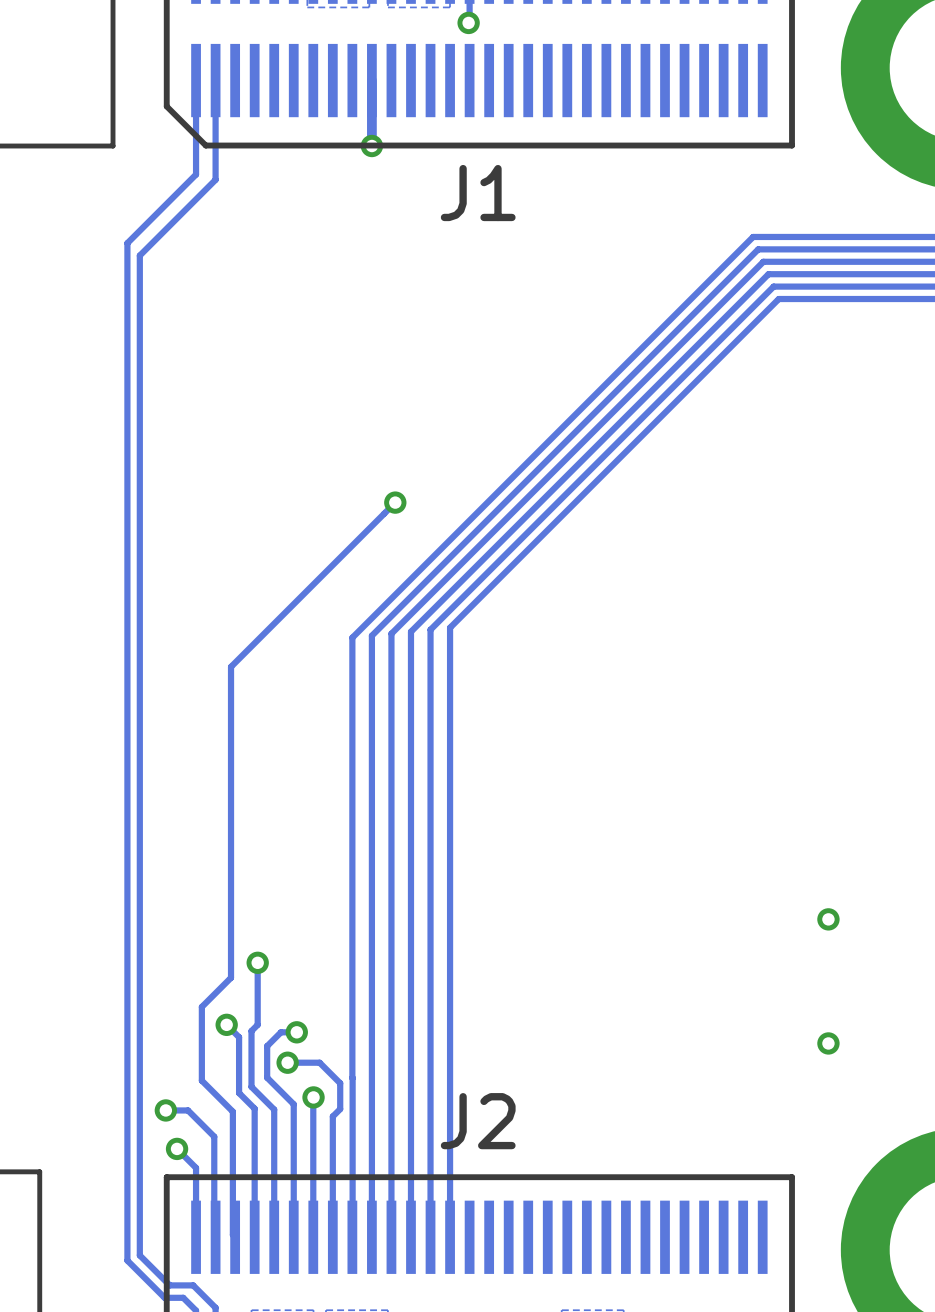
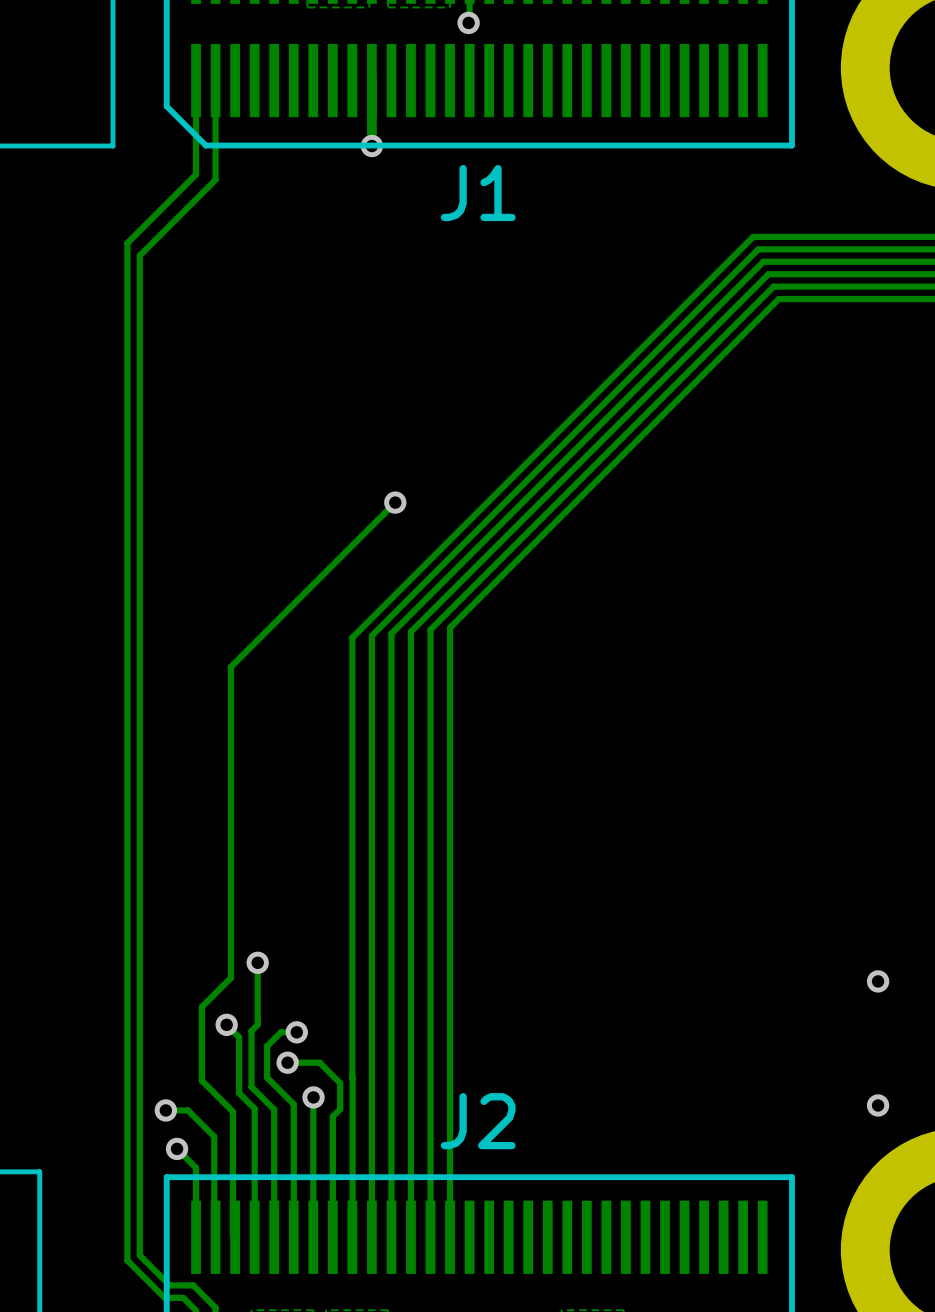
via: (828, 919) -> none
via: none -> (878, 981)
via: (828, 1043) -> none
via: none -> (878, 1105)

